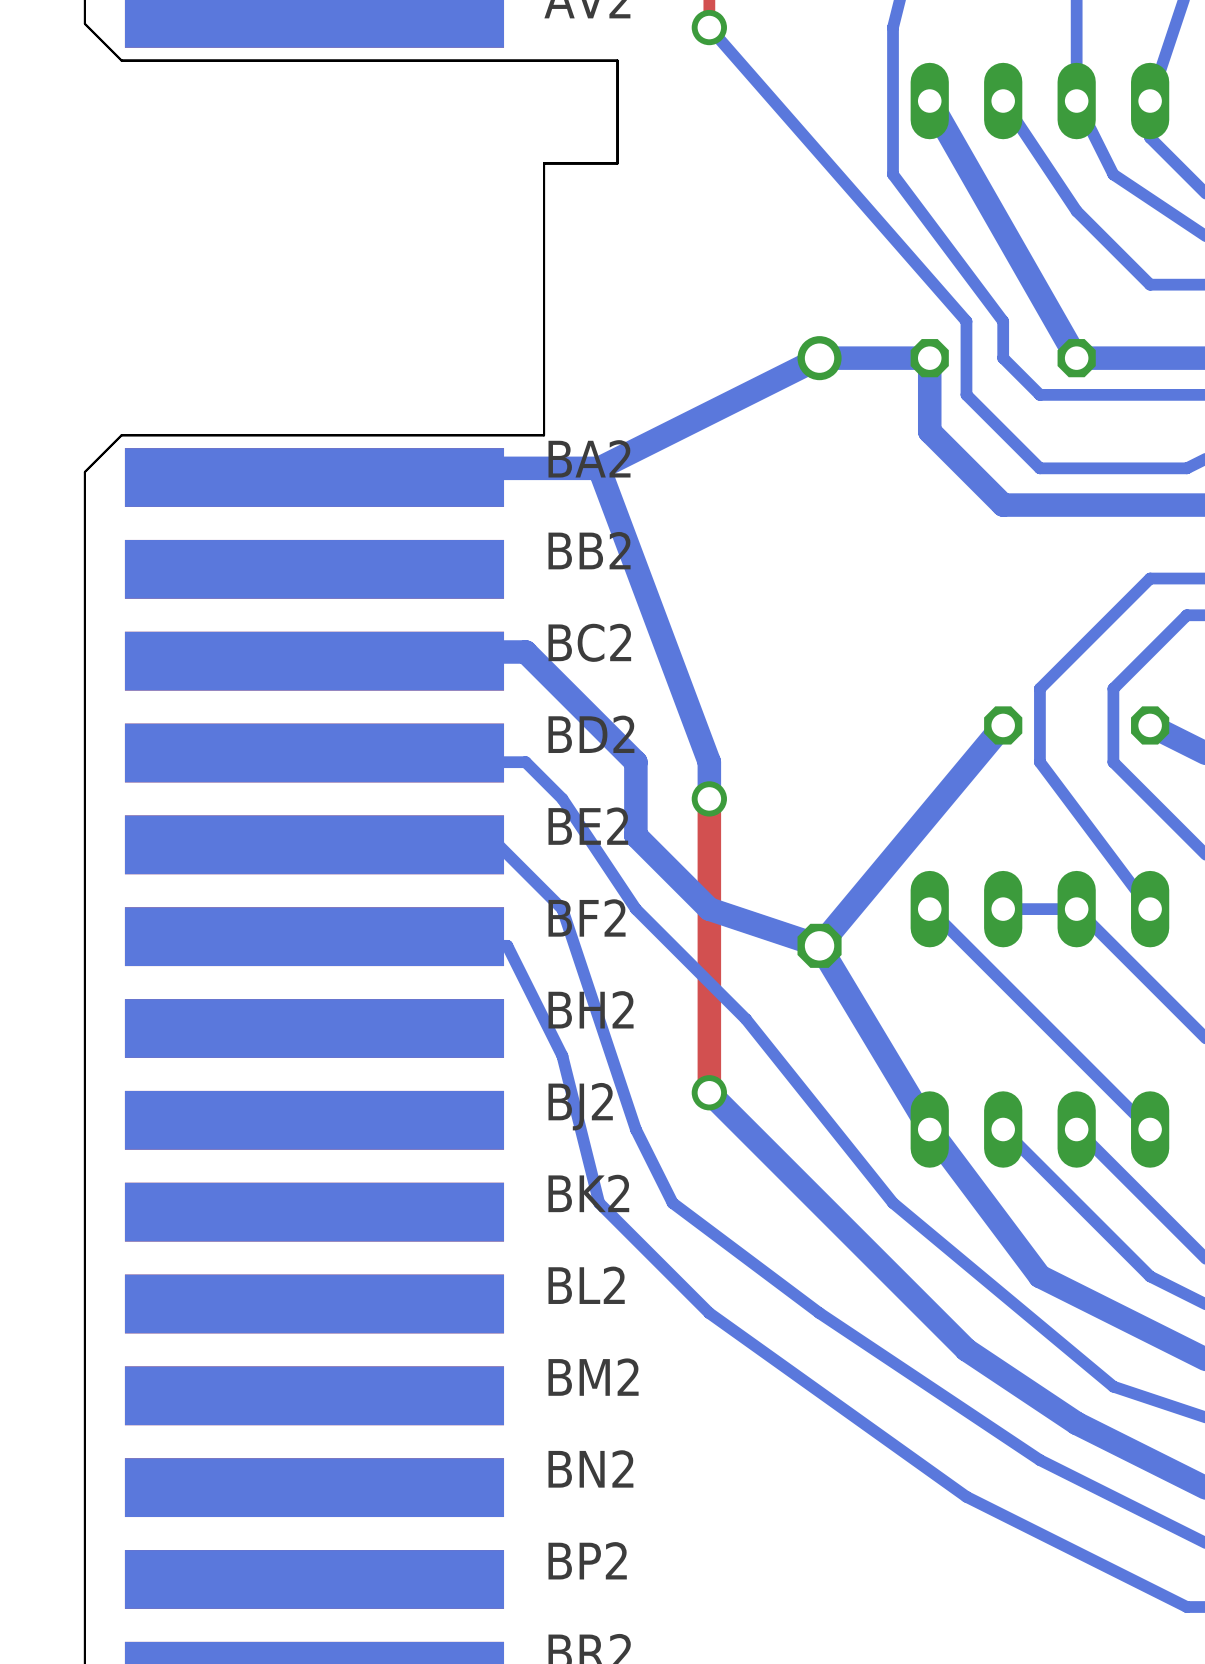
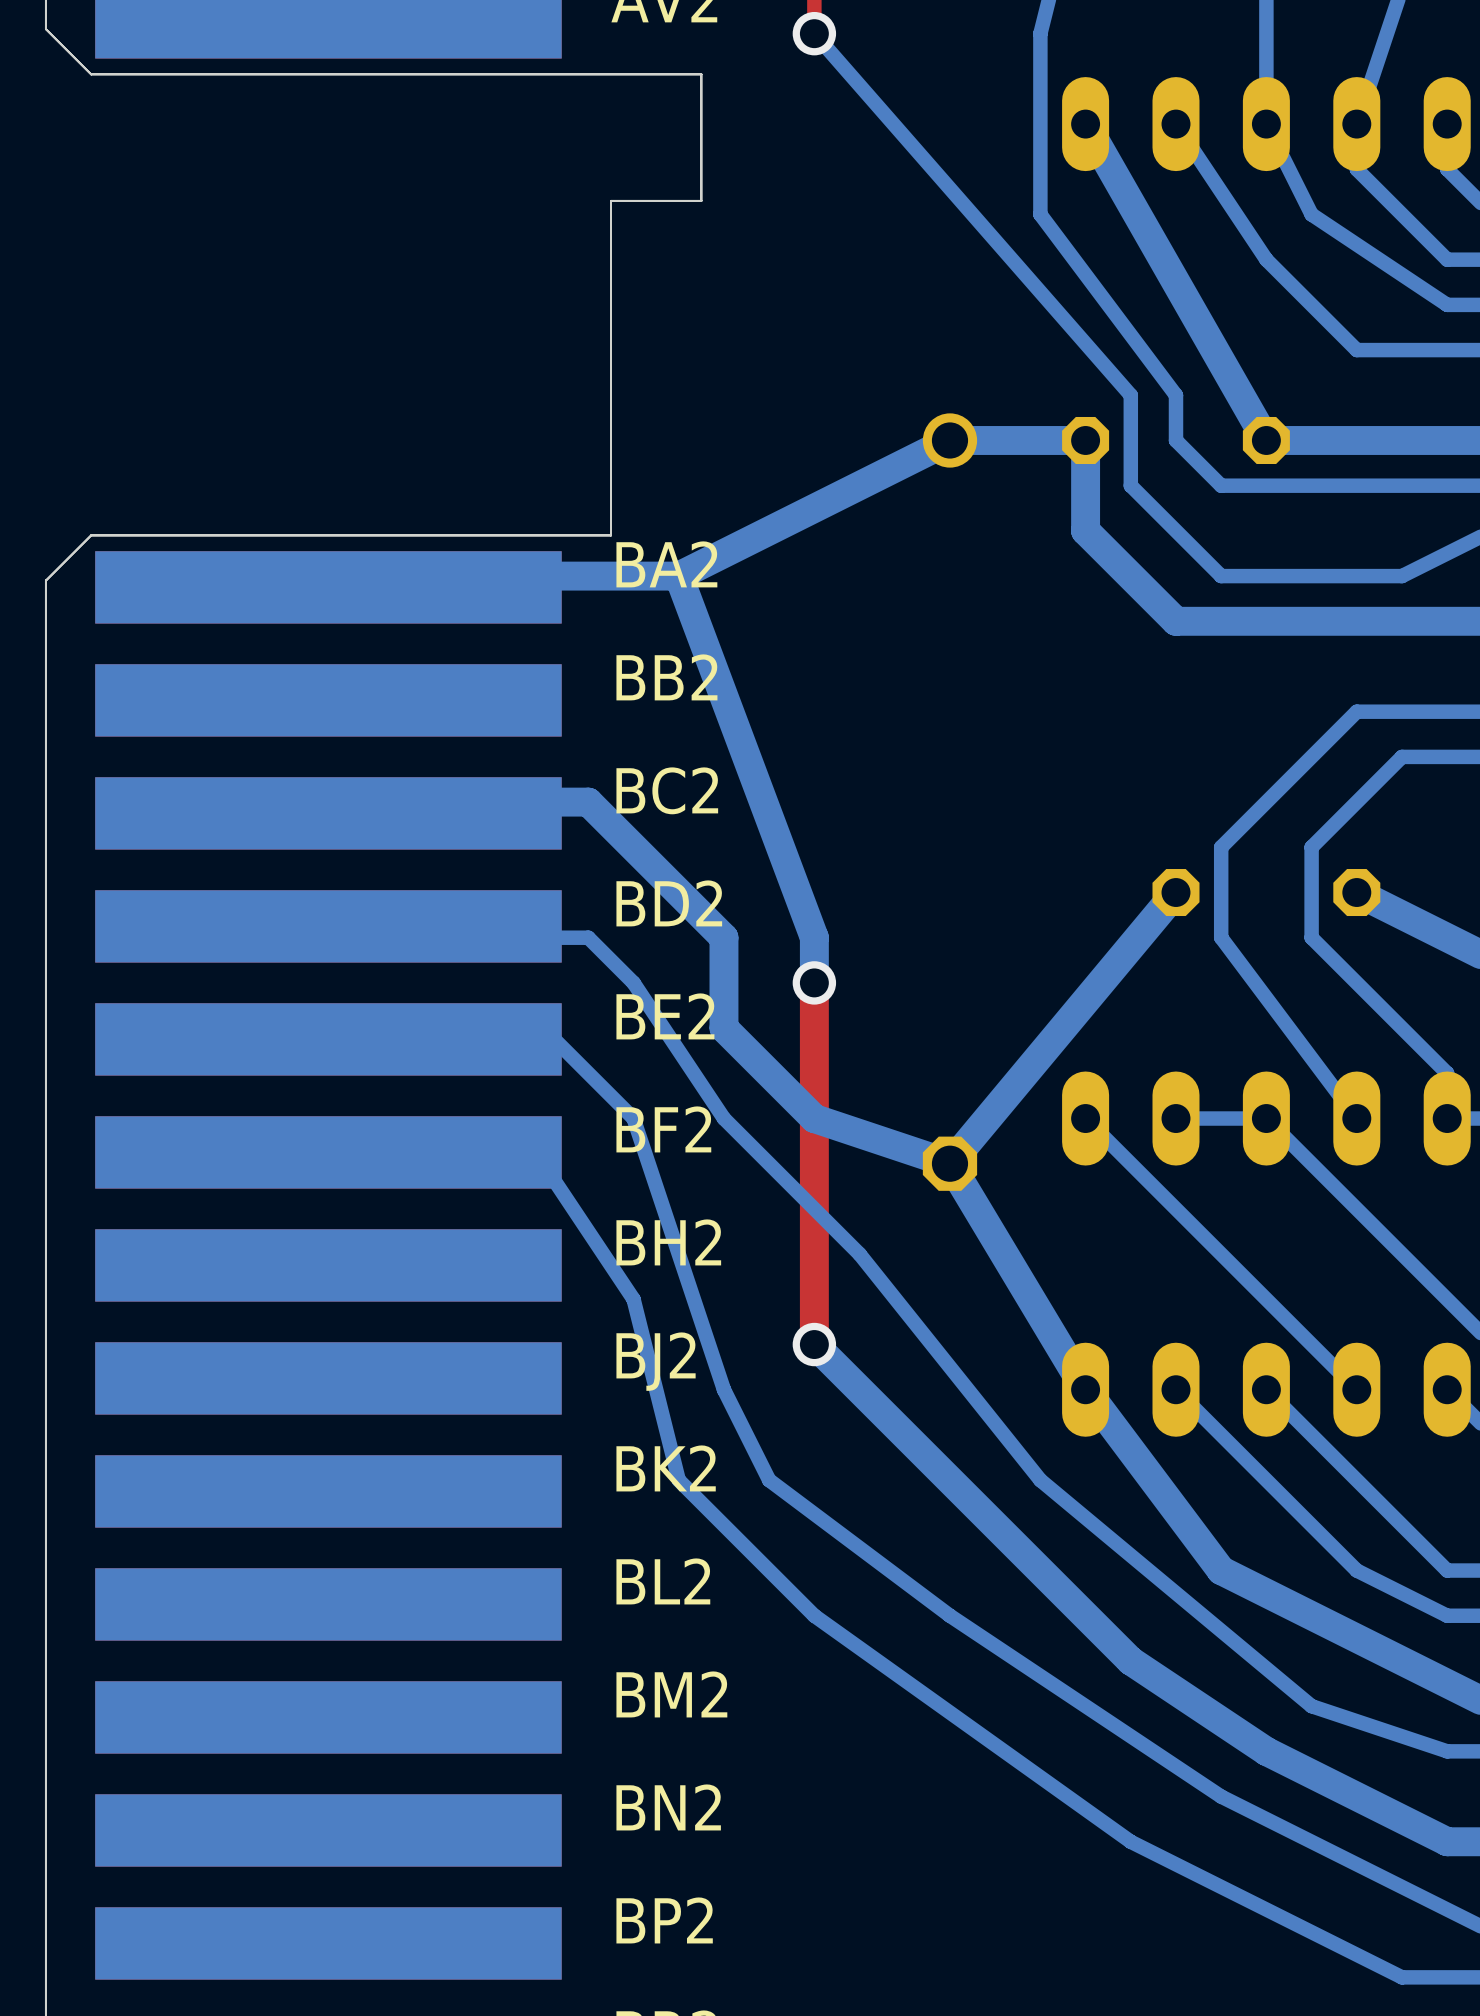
bottom track: (488, 945) (507, 945) (562, 1056) -> (543, 1163) (633, 1299)

